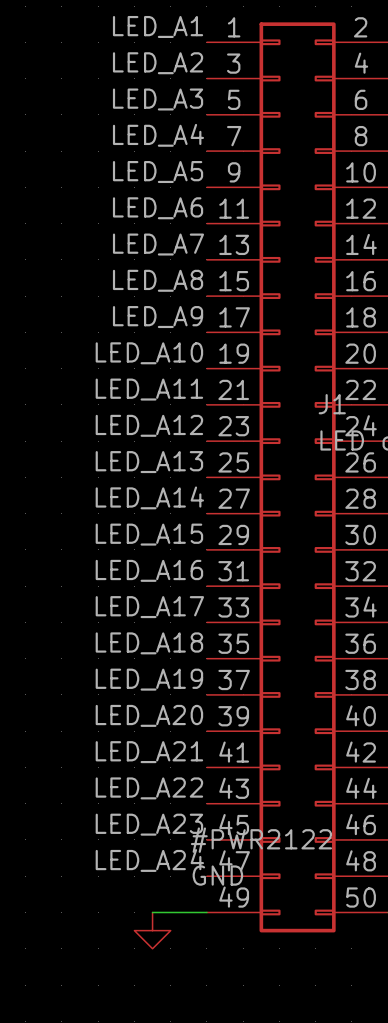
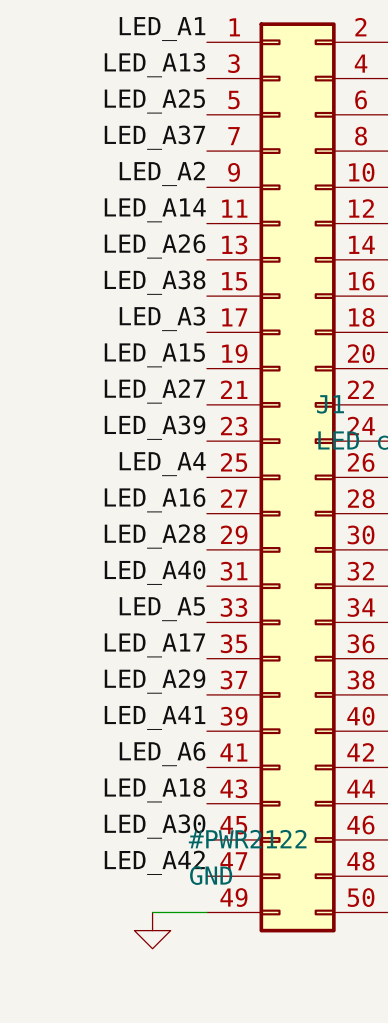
label: LED_A2 (158, 63) -> LED_A13 (154, 65)
label: LED_A3 (158, 99) -> LED_A25 (154, 101)
label: LED_A4 (158, 135) -> LED_A37 (154, 137)
label: LED_A5 (158, 172) -> LED_A2 (162, 173)
label: LED_A6 (158, 208) -> LED_A14 (155, 210)
label: LED_A7 (158, 244) -> LED_A26 (155, 246)
label: LED_A8 (158, 280) -> LED_A38 (155, 282)
label: LED_A9 (158, 317) -> LED_A3 (162, 318)
label: LED_A10 (149, 353) -> LED_A15 (154, 355)
label: LED_A11 (149, 389) -> LED_A27 (154, 391)
label: LED_A12 (149, 425) -> LED_A39 (155, 427)
label: LED_A13 (149, 462) -> LED_A4 (162, 464)
label: LED_A14 (149, 497) -> LED_A16 (155, 500)
label: LED_A15 (149, 534) -> LED_A28 (155, 536)
label: LED_A16 (149, 570) -> LED_A40 (155, 572)
label: LED_A17 (149, 607) -> LED_A5 (162, 609)
label: LED_A18 (149, 643) -> LED_A17 (154, 645)
label: LED_A19 (149, 679) -> LED_A29 (155, 681)
label: LED_A20 (149, 715) -> LED_A41 (155, 717)
label: LED_A21 (149, 752) -> LED_A6 (162, 754)
label: LED_A22 (149, 788) -> LED_A18 (155, 790)
label: LED_A23 (149, 824) -> LED_A30 (155, 826)
label: LED_A24 (149, 860) -> LED_A42 (154, 862)

